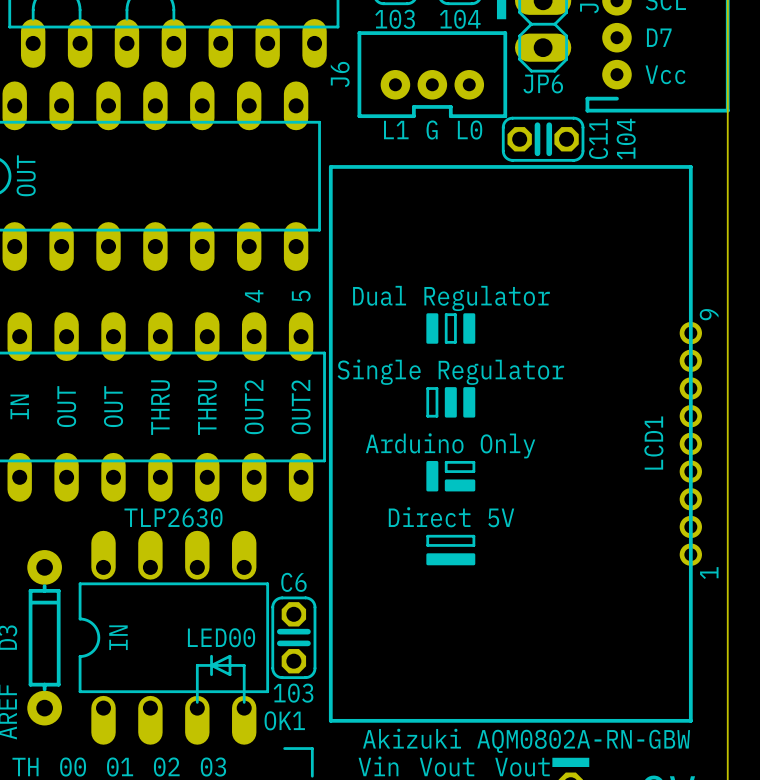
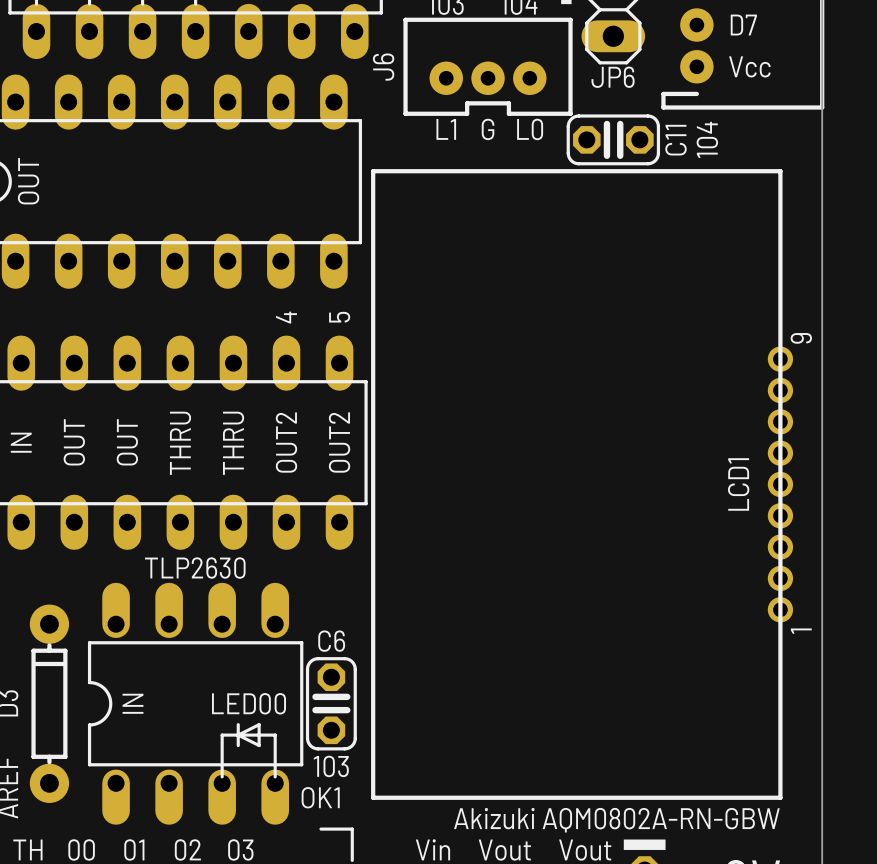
text: Dual Regulator (451, 298) -> none
drawing: [426, 313, 439, 344] -> none
drawing: [463, 313, 476, 344] -> none
line: (446, 314) (455, 314) (455, 342) (446, 342) (446, 314) -> none
text: Single Regulator (450, 372) -> none
drawing: [444, 387, 476, 418] -> none
line: (427, 388) (427, 416) (436, 416) (436, 388) (427, 388) -> none
text: Arduino Only (450, 445) -> none
drawing: [426, 460, 476, 492] -> none
line: (446, 462) (446, 471) (473, 471) (473, 462) (446, 462) -> none
text: Direct 5V (451, 517) -> none
line: (427, 536) (427, 545) (473, 545) (473, 536) (427, 536) -> none
drawing: [426, 553, 476, 566] -> none

